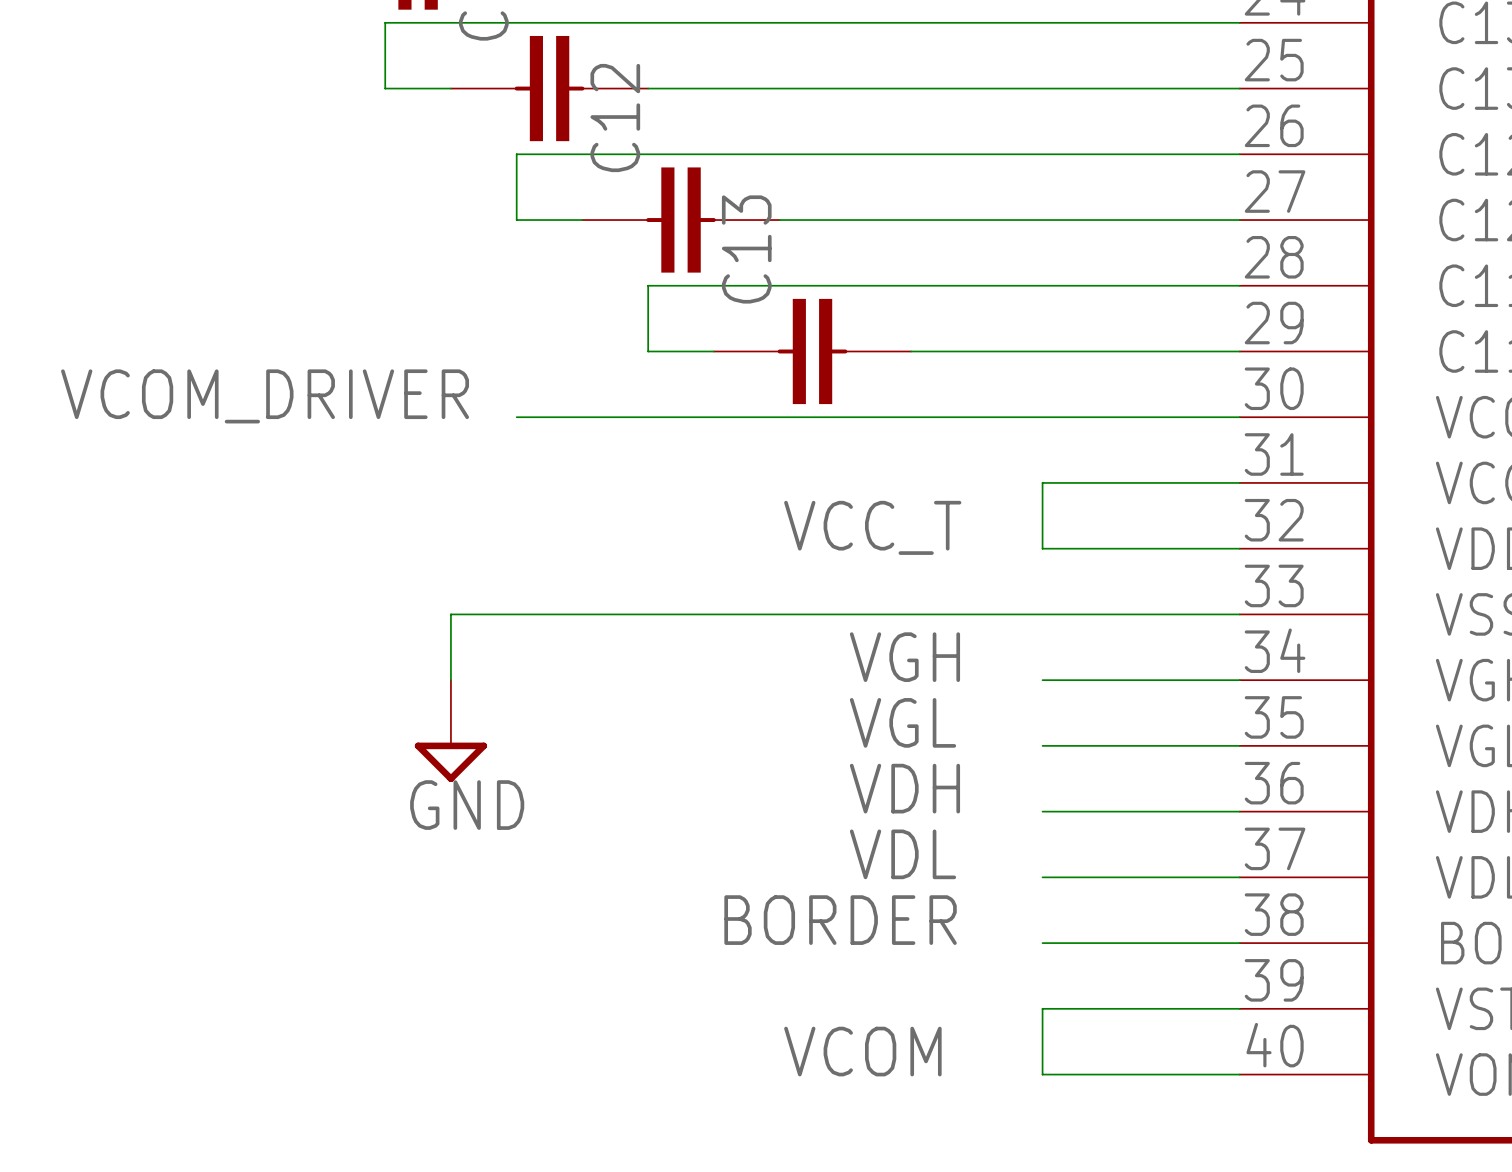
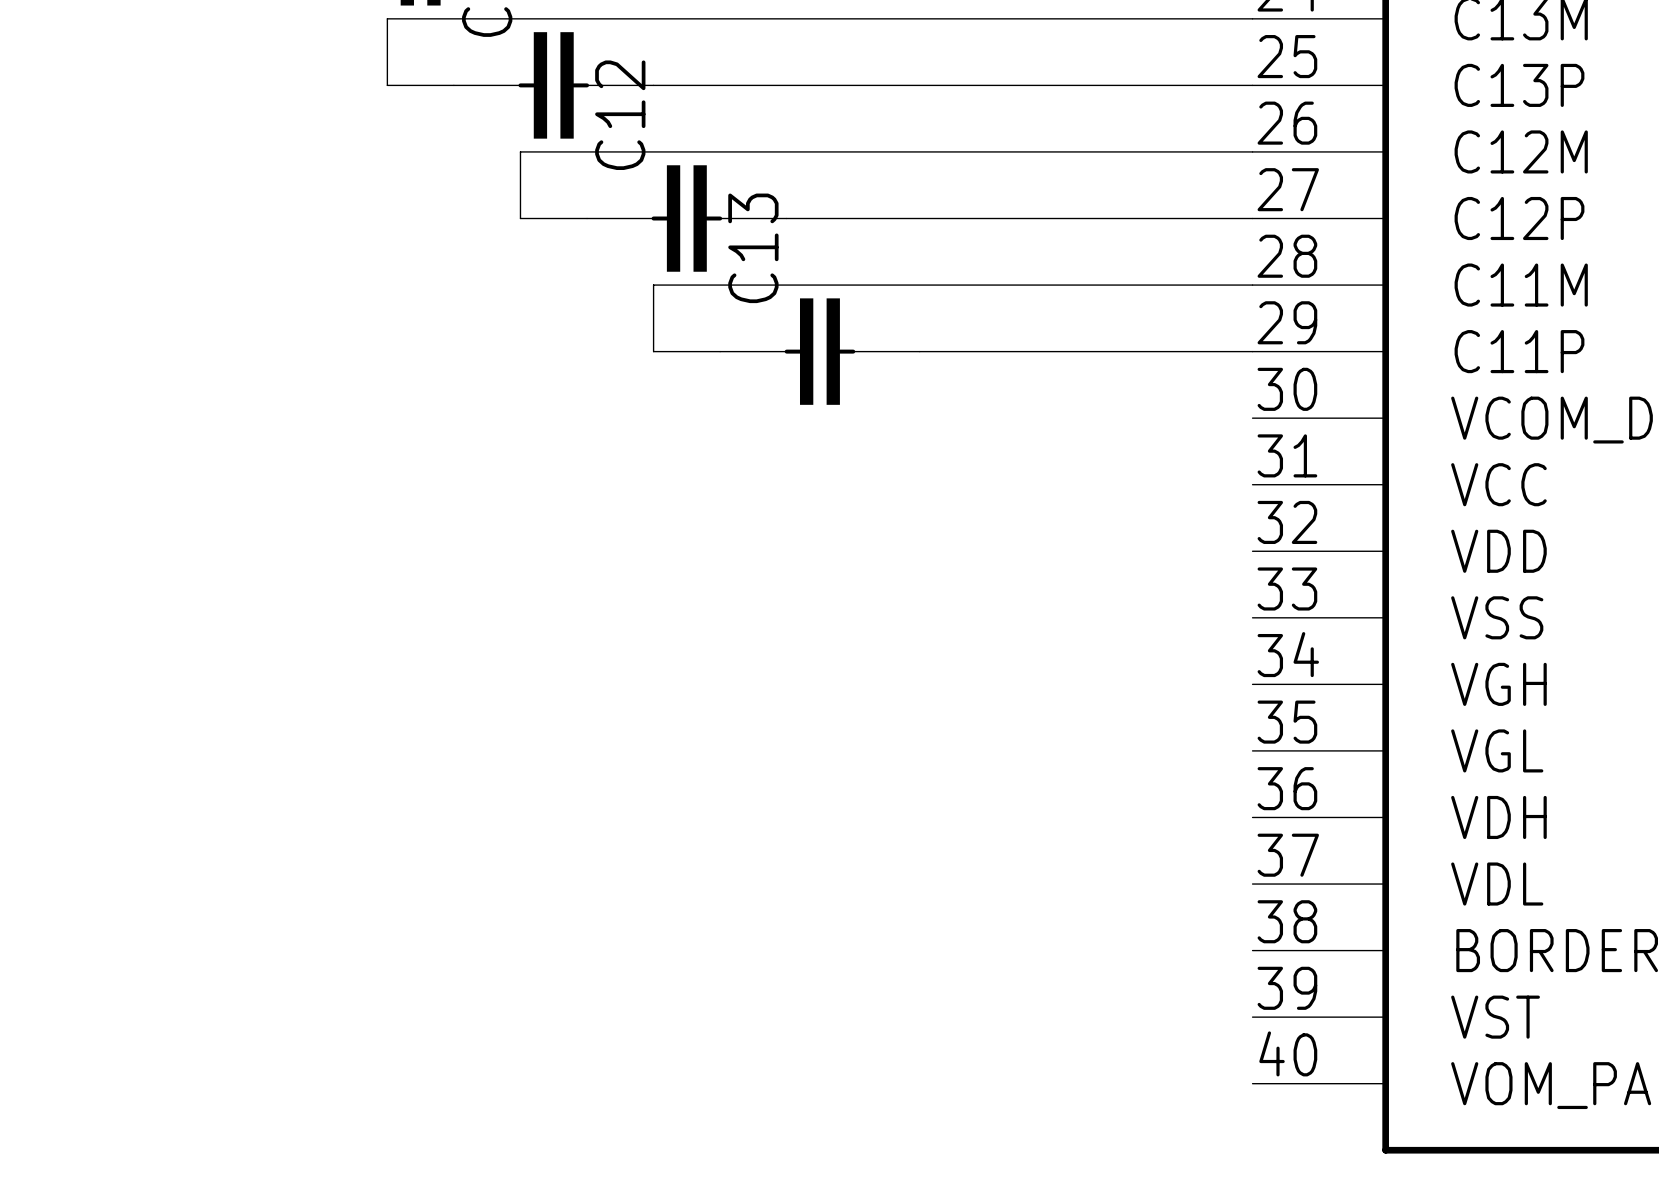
label: VCOM_DRIVER (265, 396) -> none
wire: (516, 417) (1239, 417) -> none
wire: (1239, 482) (1042, 482) (1042, 548) (1239, 548) -> none
label: VCC_T (872, 527) -> none
wire: (1239, 614) (450, 614) (450, 680) -> none
label: VGH (904, 657) -> none
wire: (1042, 680) (1239, 680) -> none
label: VGL (903, 722) -> none
power symbol: GND (450, 731) -> none
wire: (1042, 745) (1239, 745) -> none
label: VDH (904, 788) -> none
wire: (1042, 811) (1239, 811) -> none
label: VDL (903, 854) -> none
wire: (1042, 877) (1239, 877) -> none
label: BORDER (840, 920) -> none
wire: (1042, 943) (1239, 943) -> none
wire: (1239, 1008) (1042, 1008) (1042, 1074) (1239, 1074) -> none
label: VCOM (862, 1051) -> none

